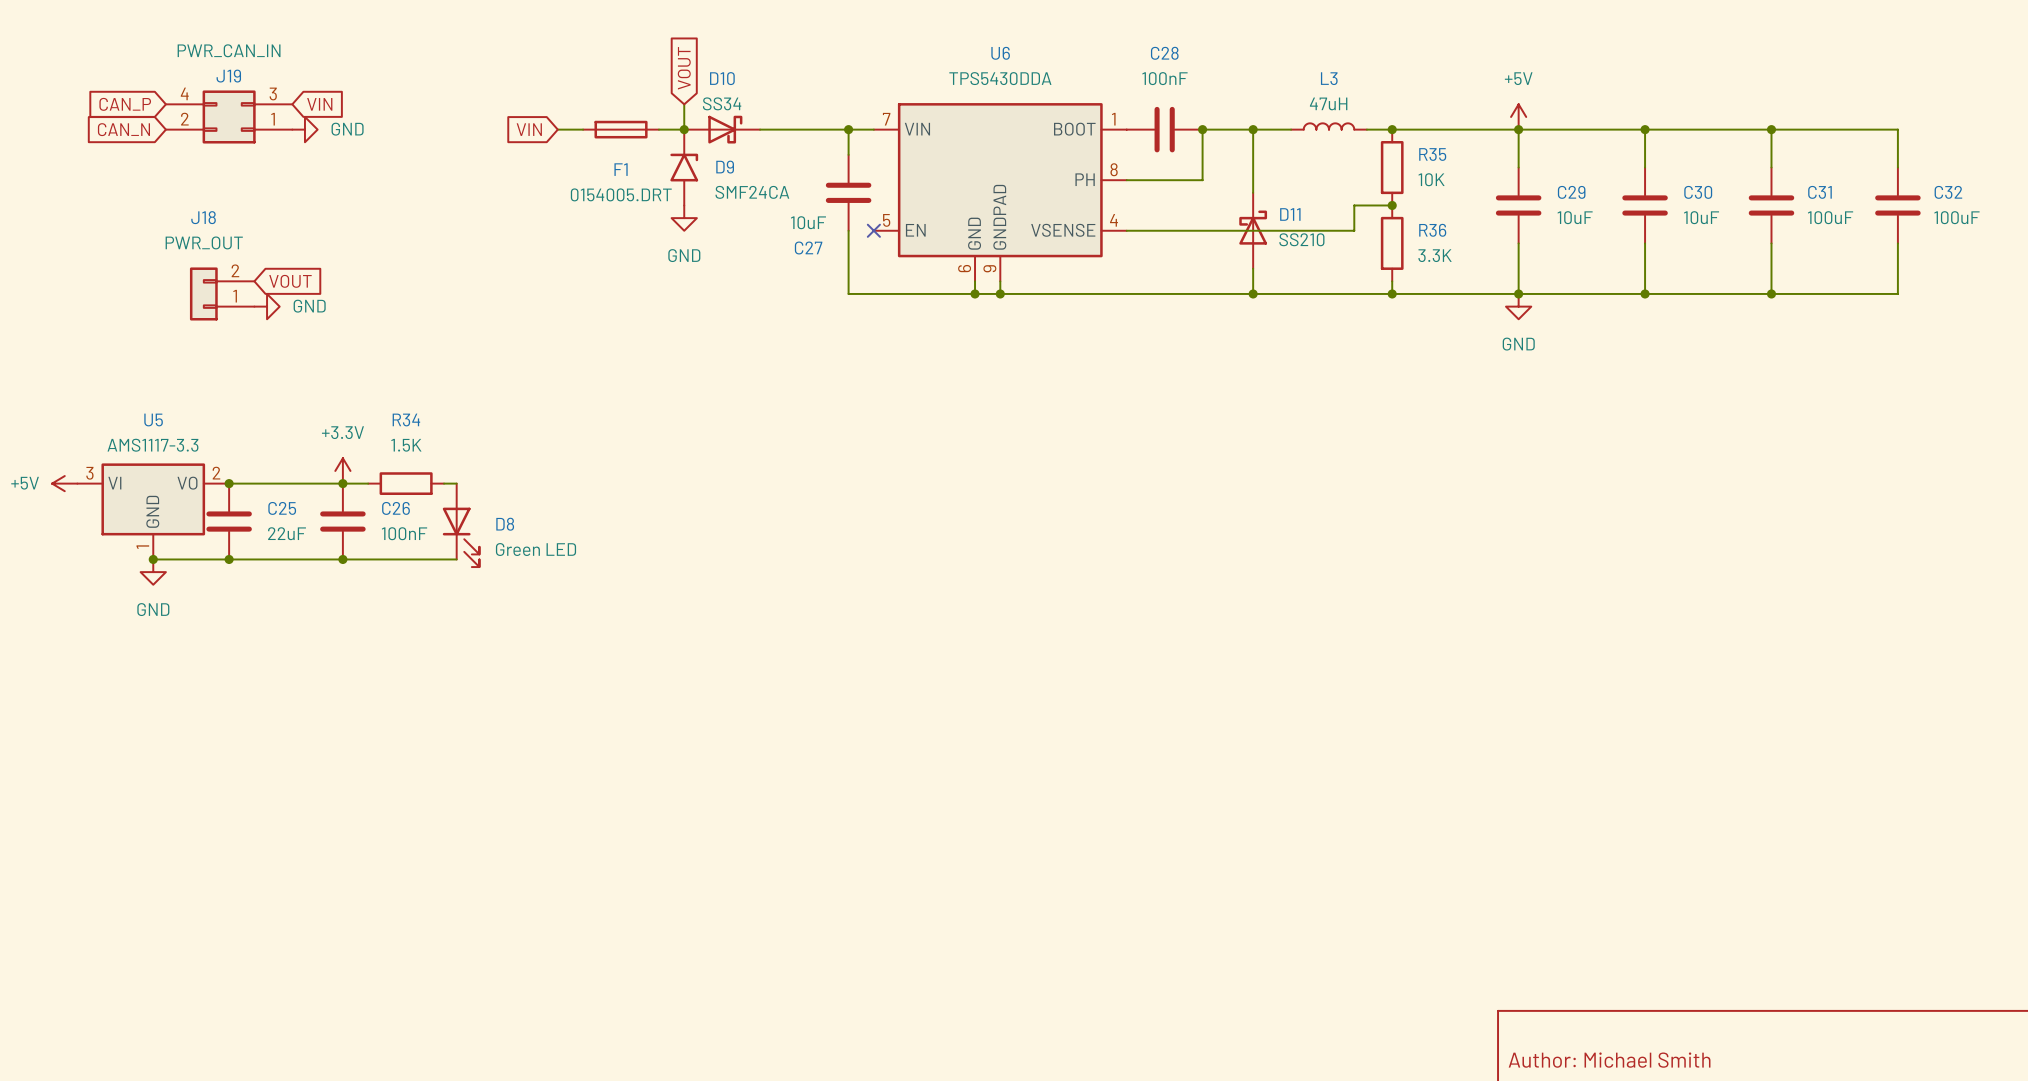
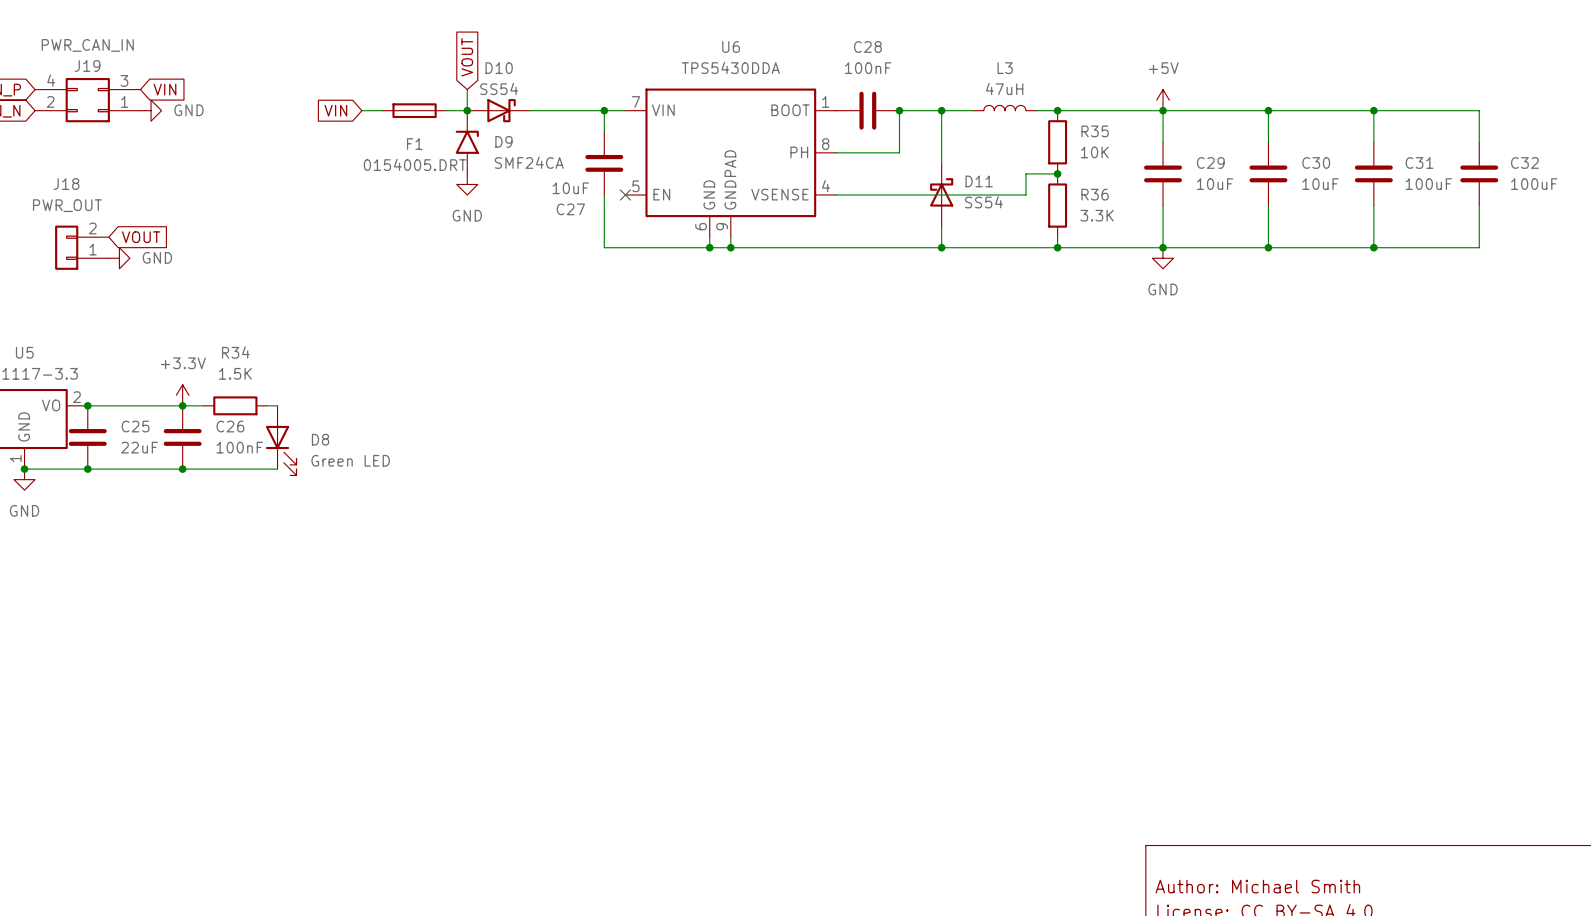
D10 value: SS34 (722, 103) -> SS54 (499, 88)
D11 value: SS210 (1301, 239) -> SS54 (983, 202)

